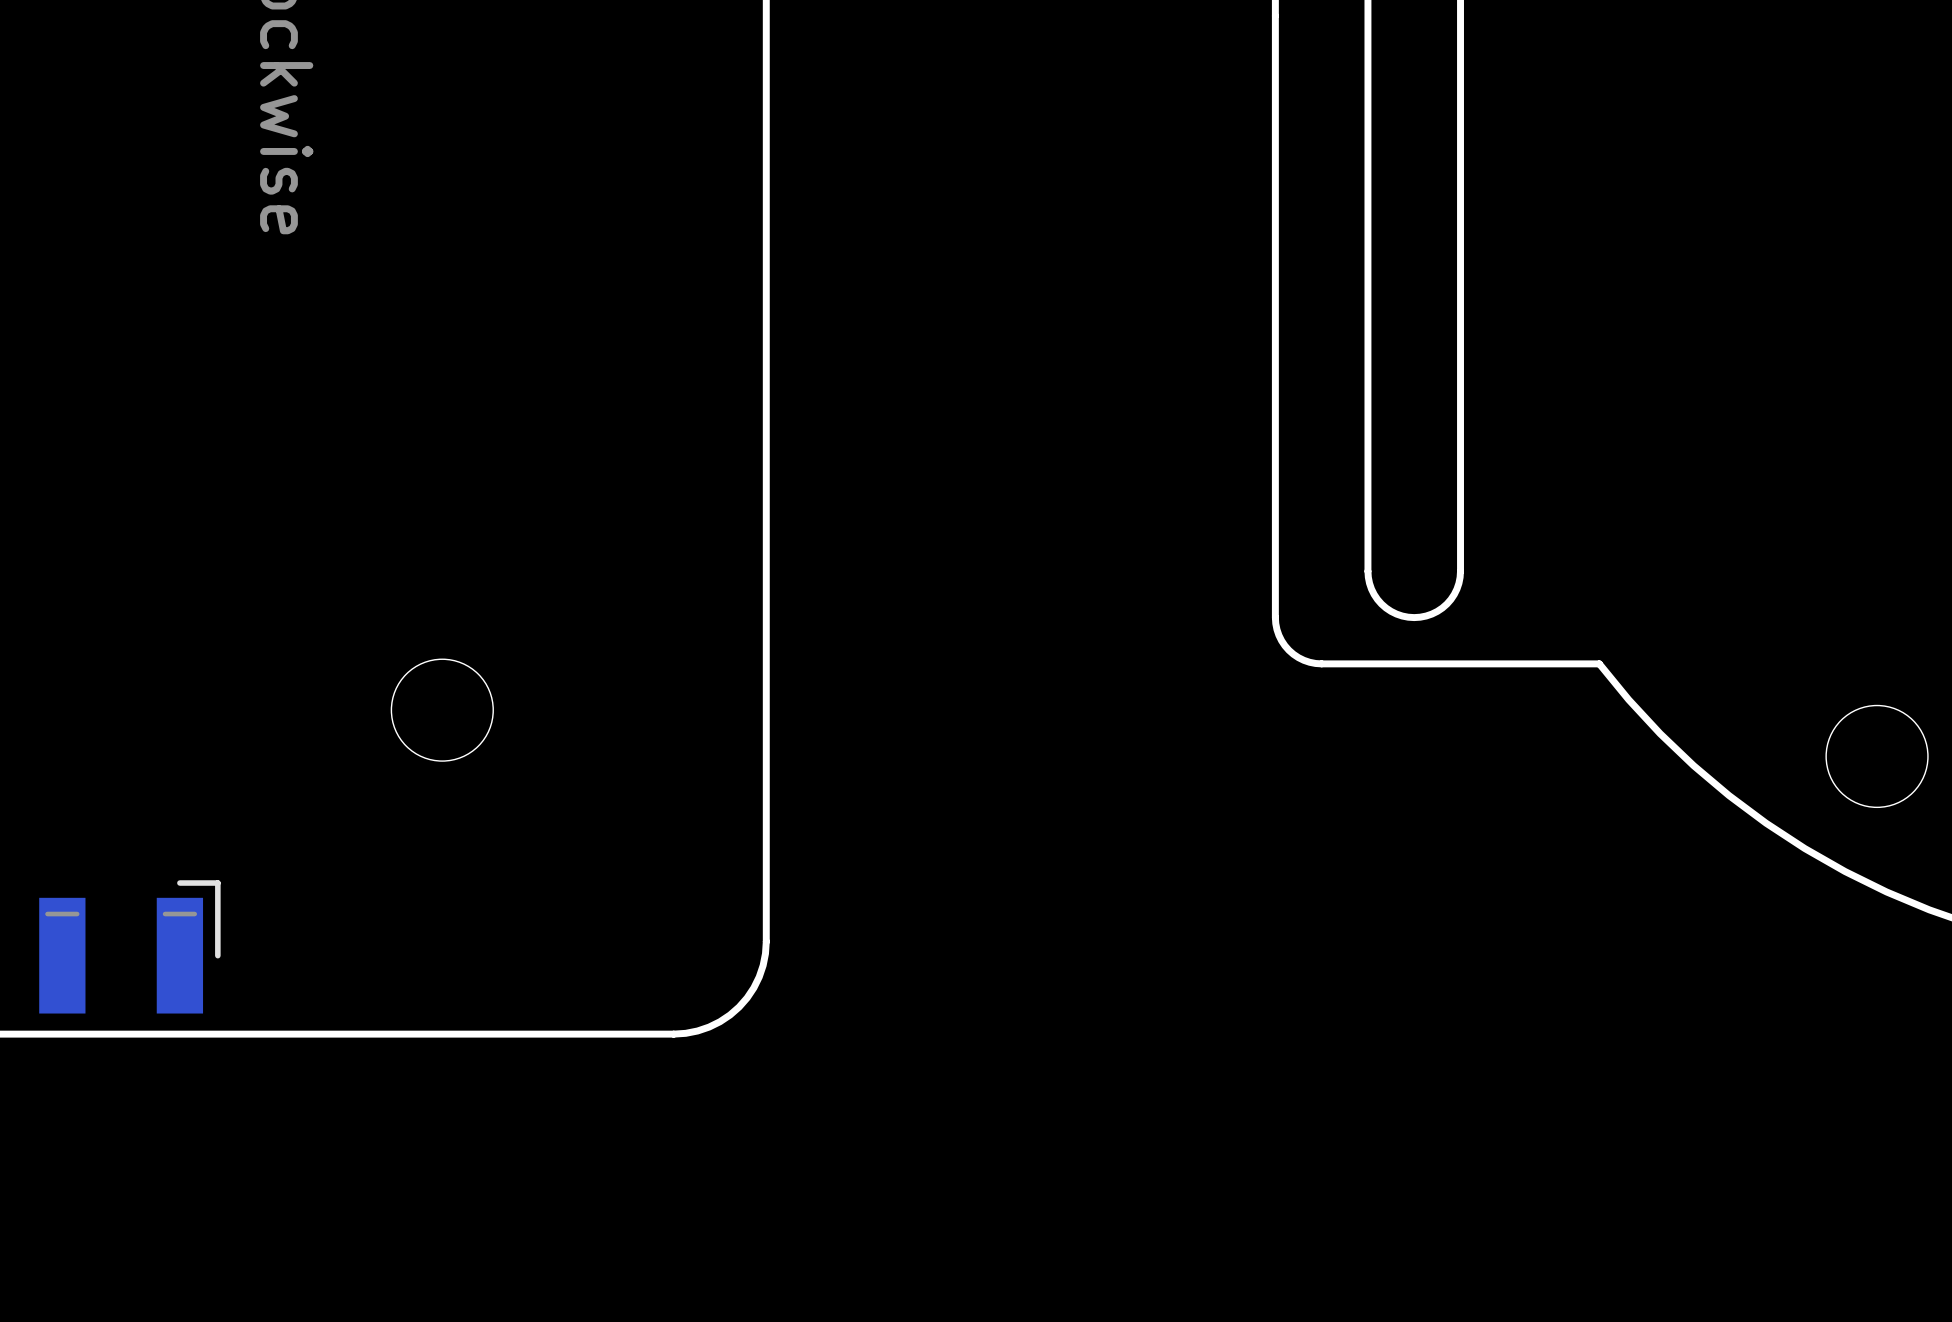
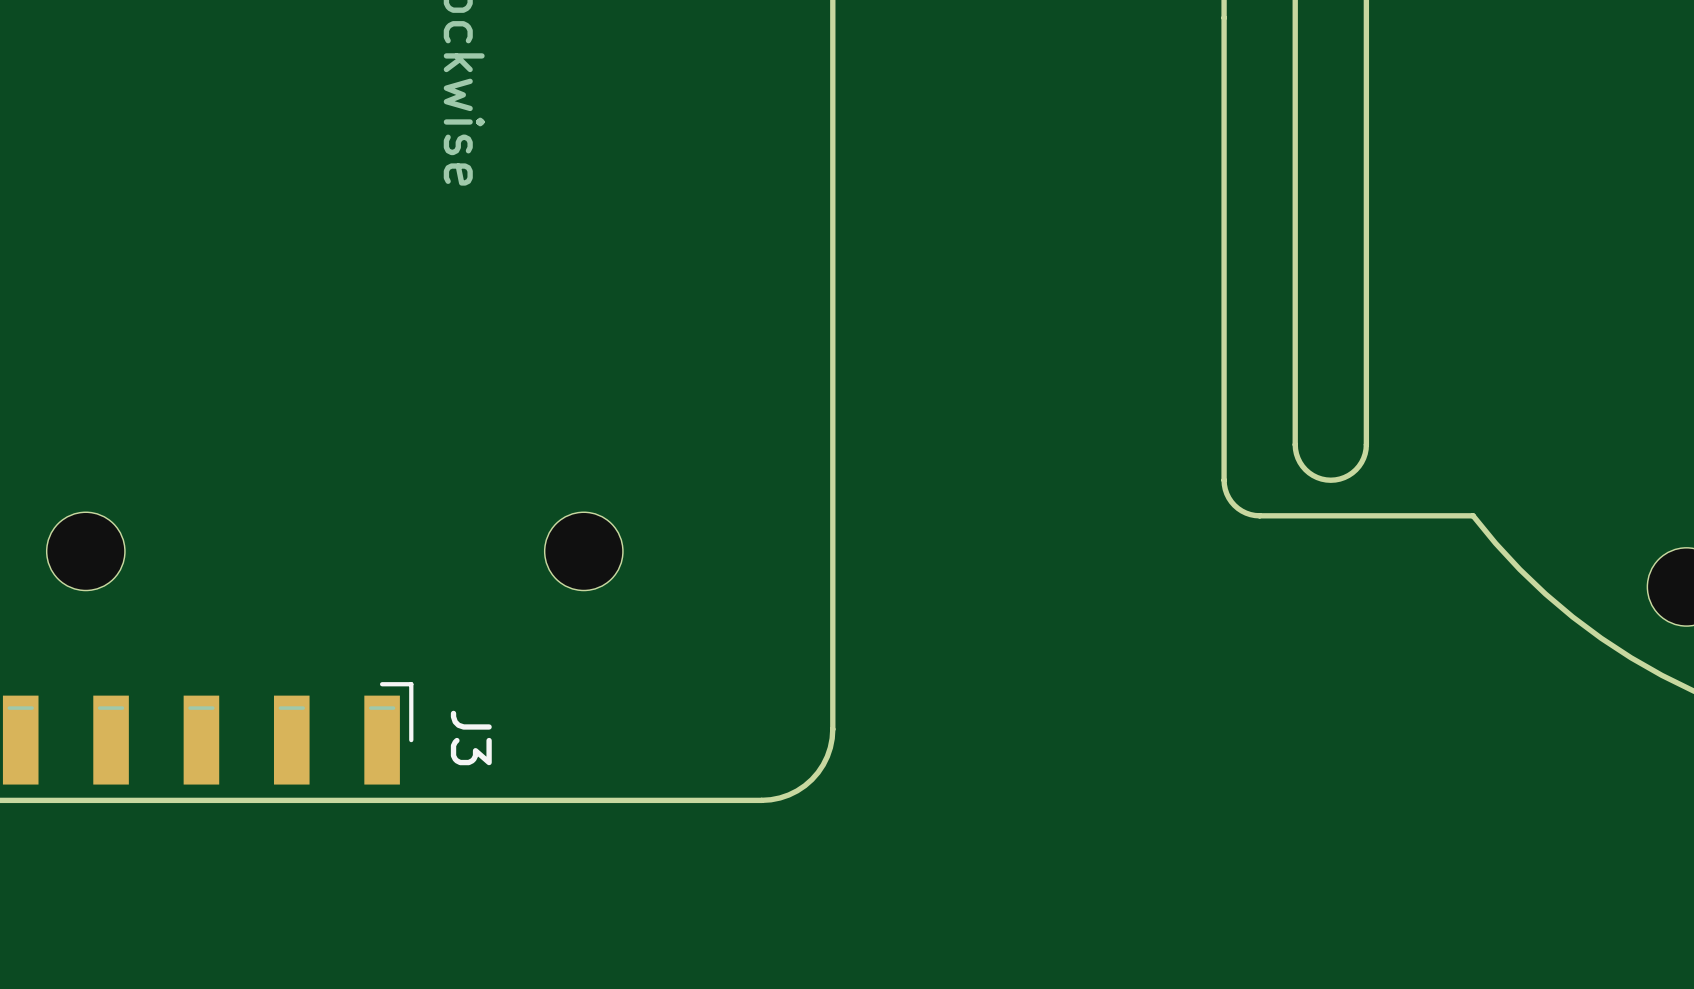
J3 name: none -> J3 (471, 737)

